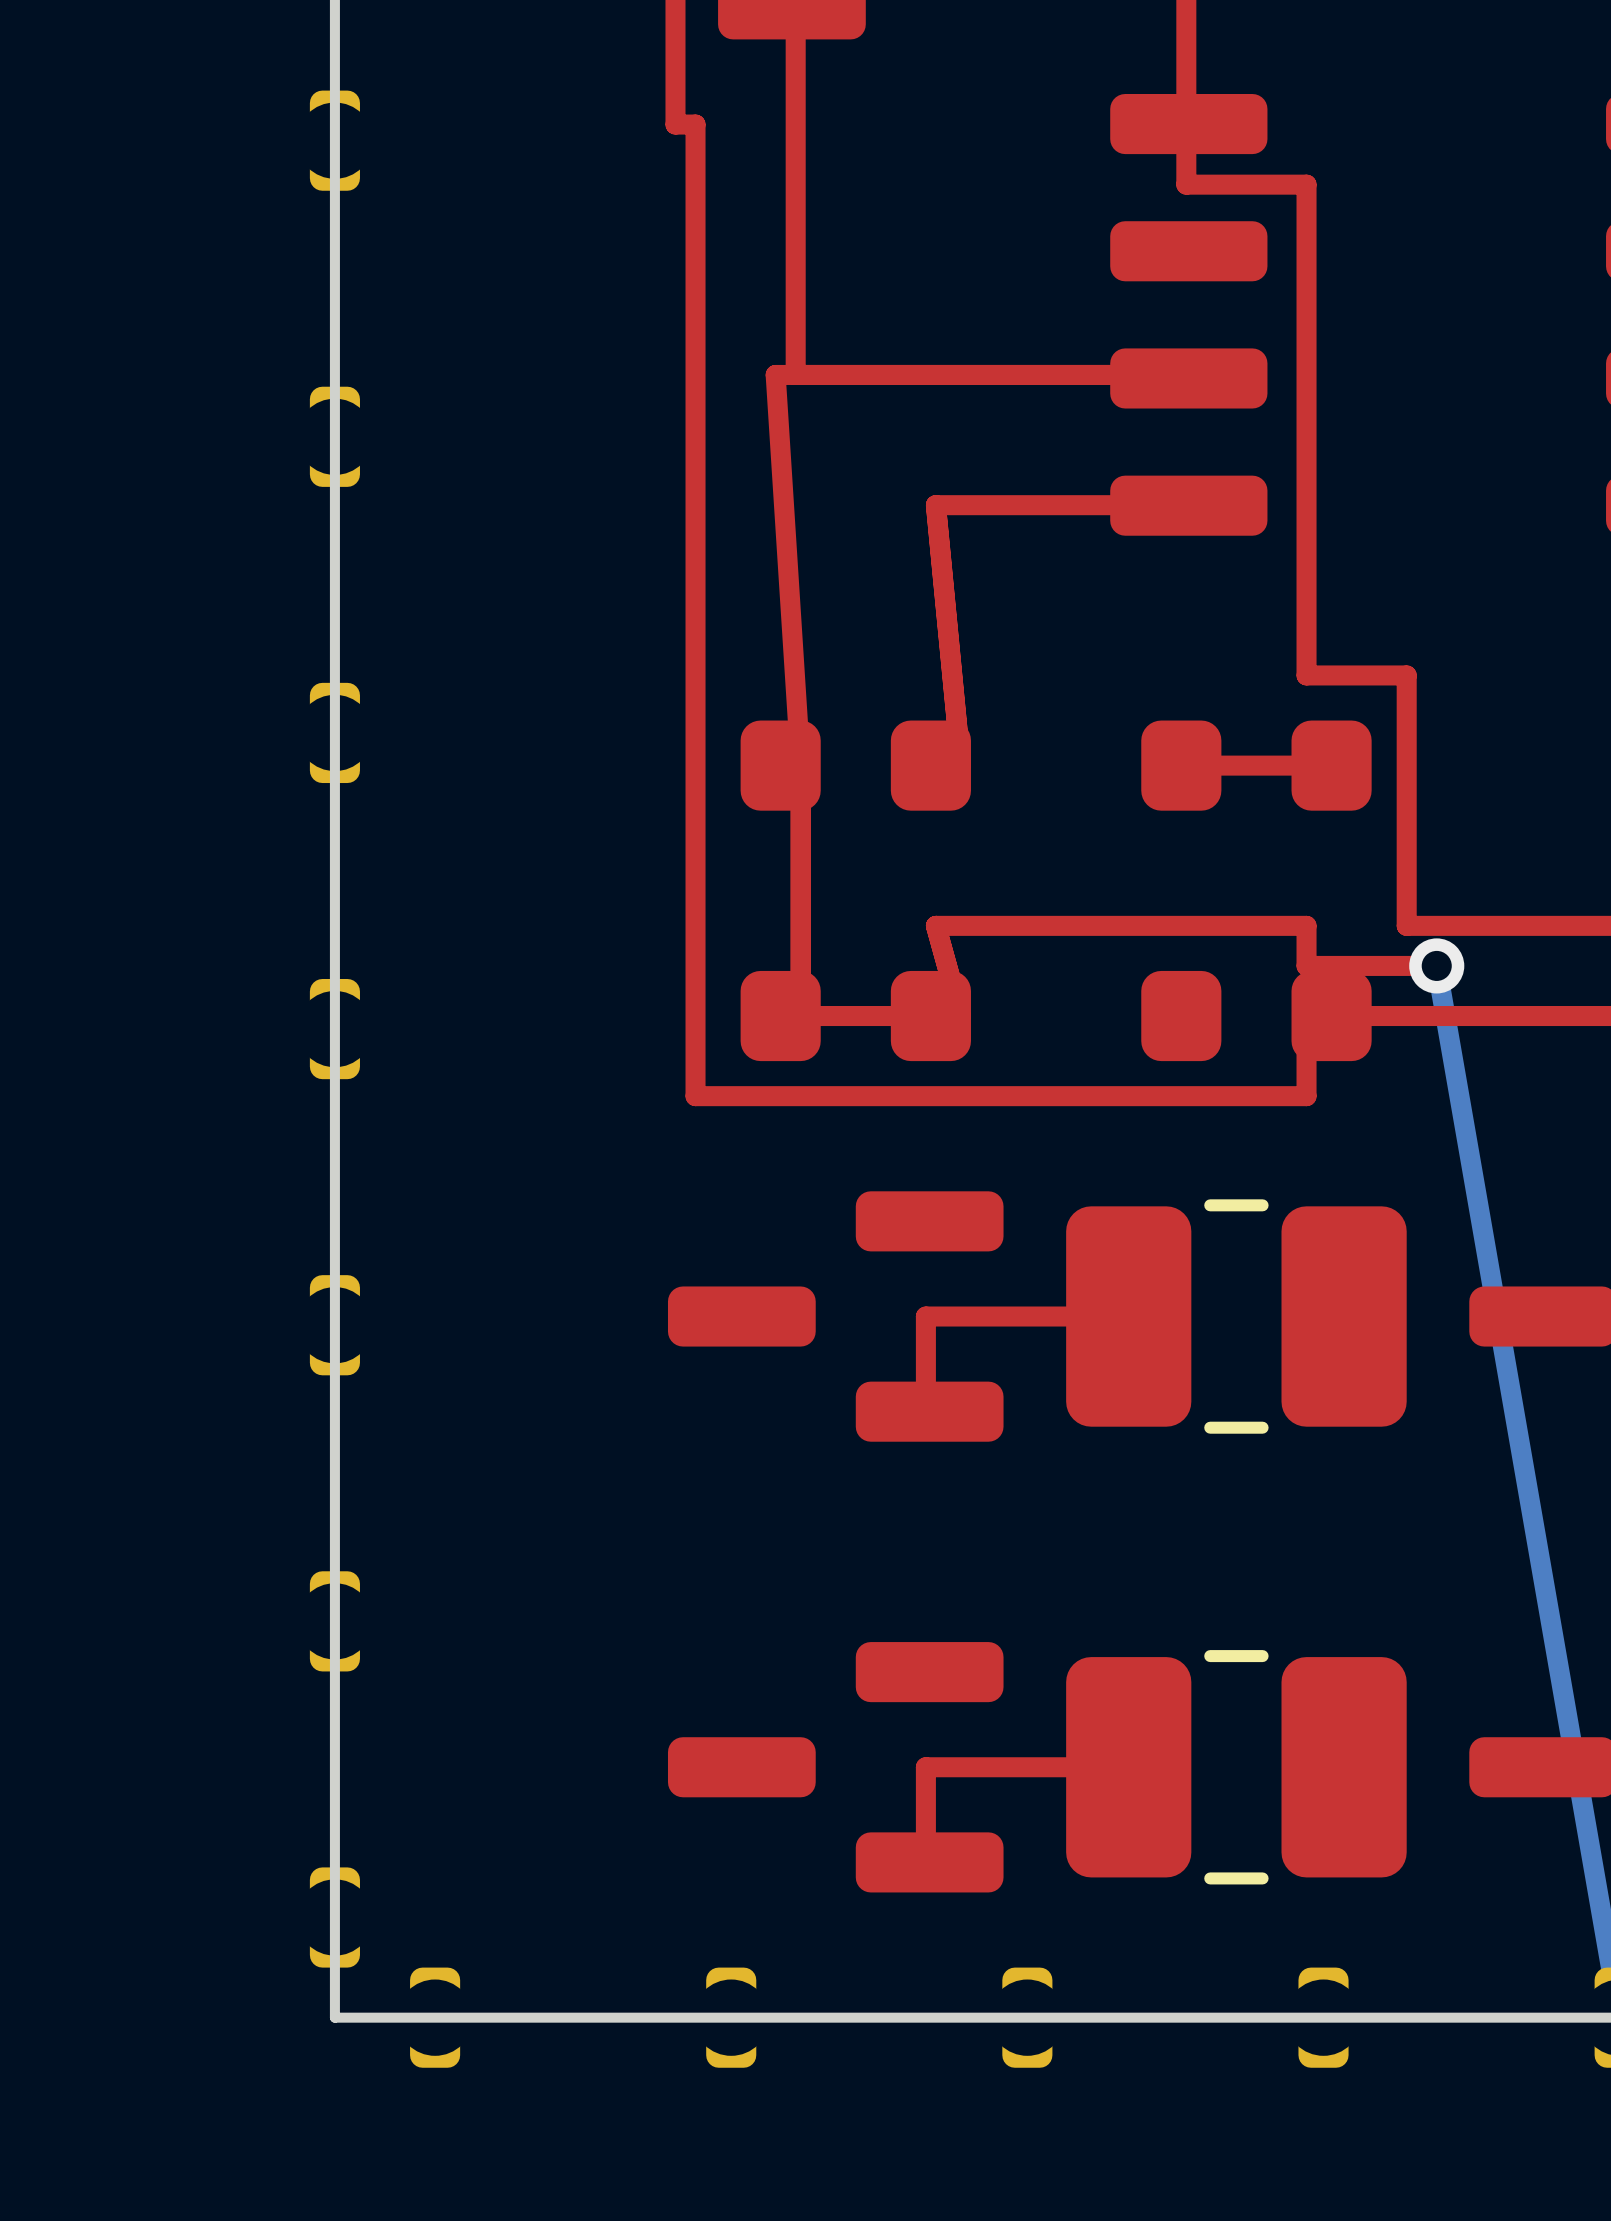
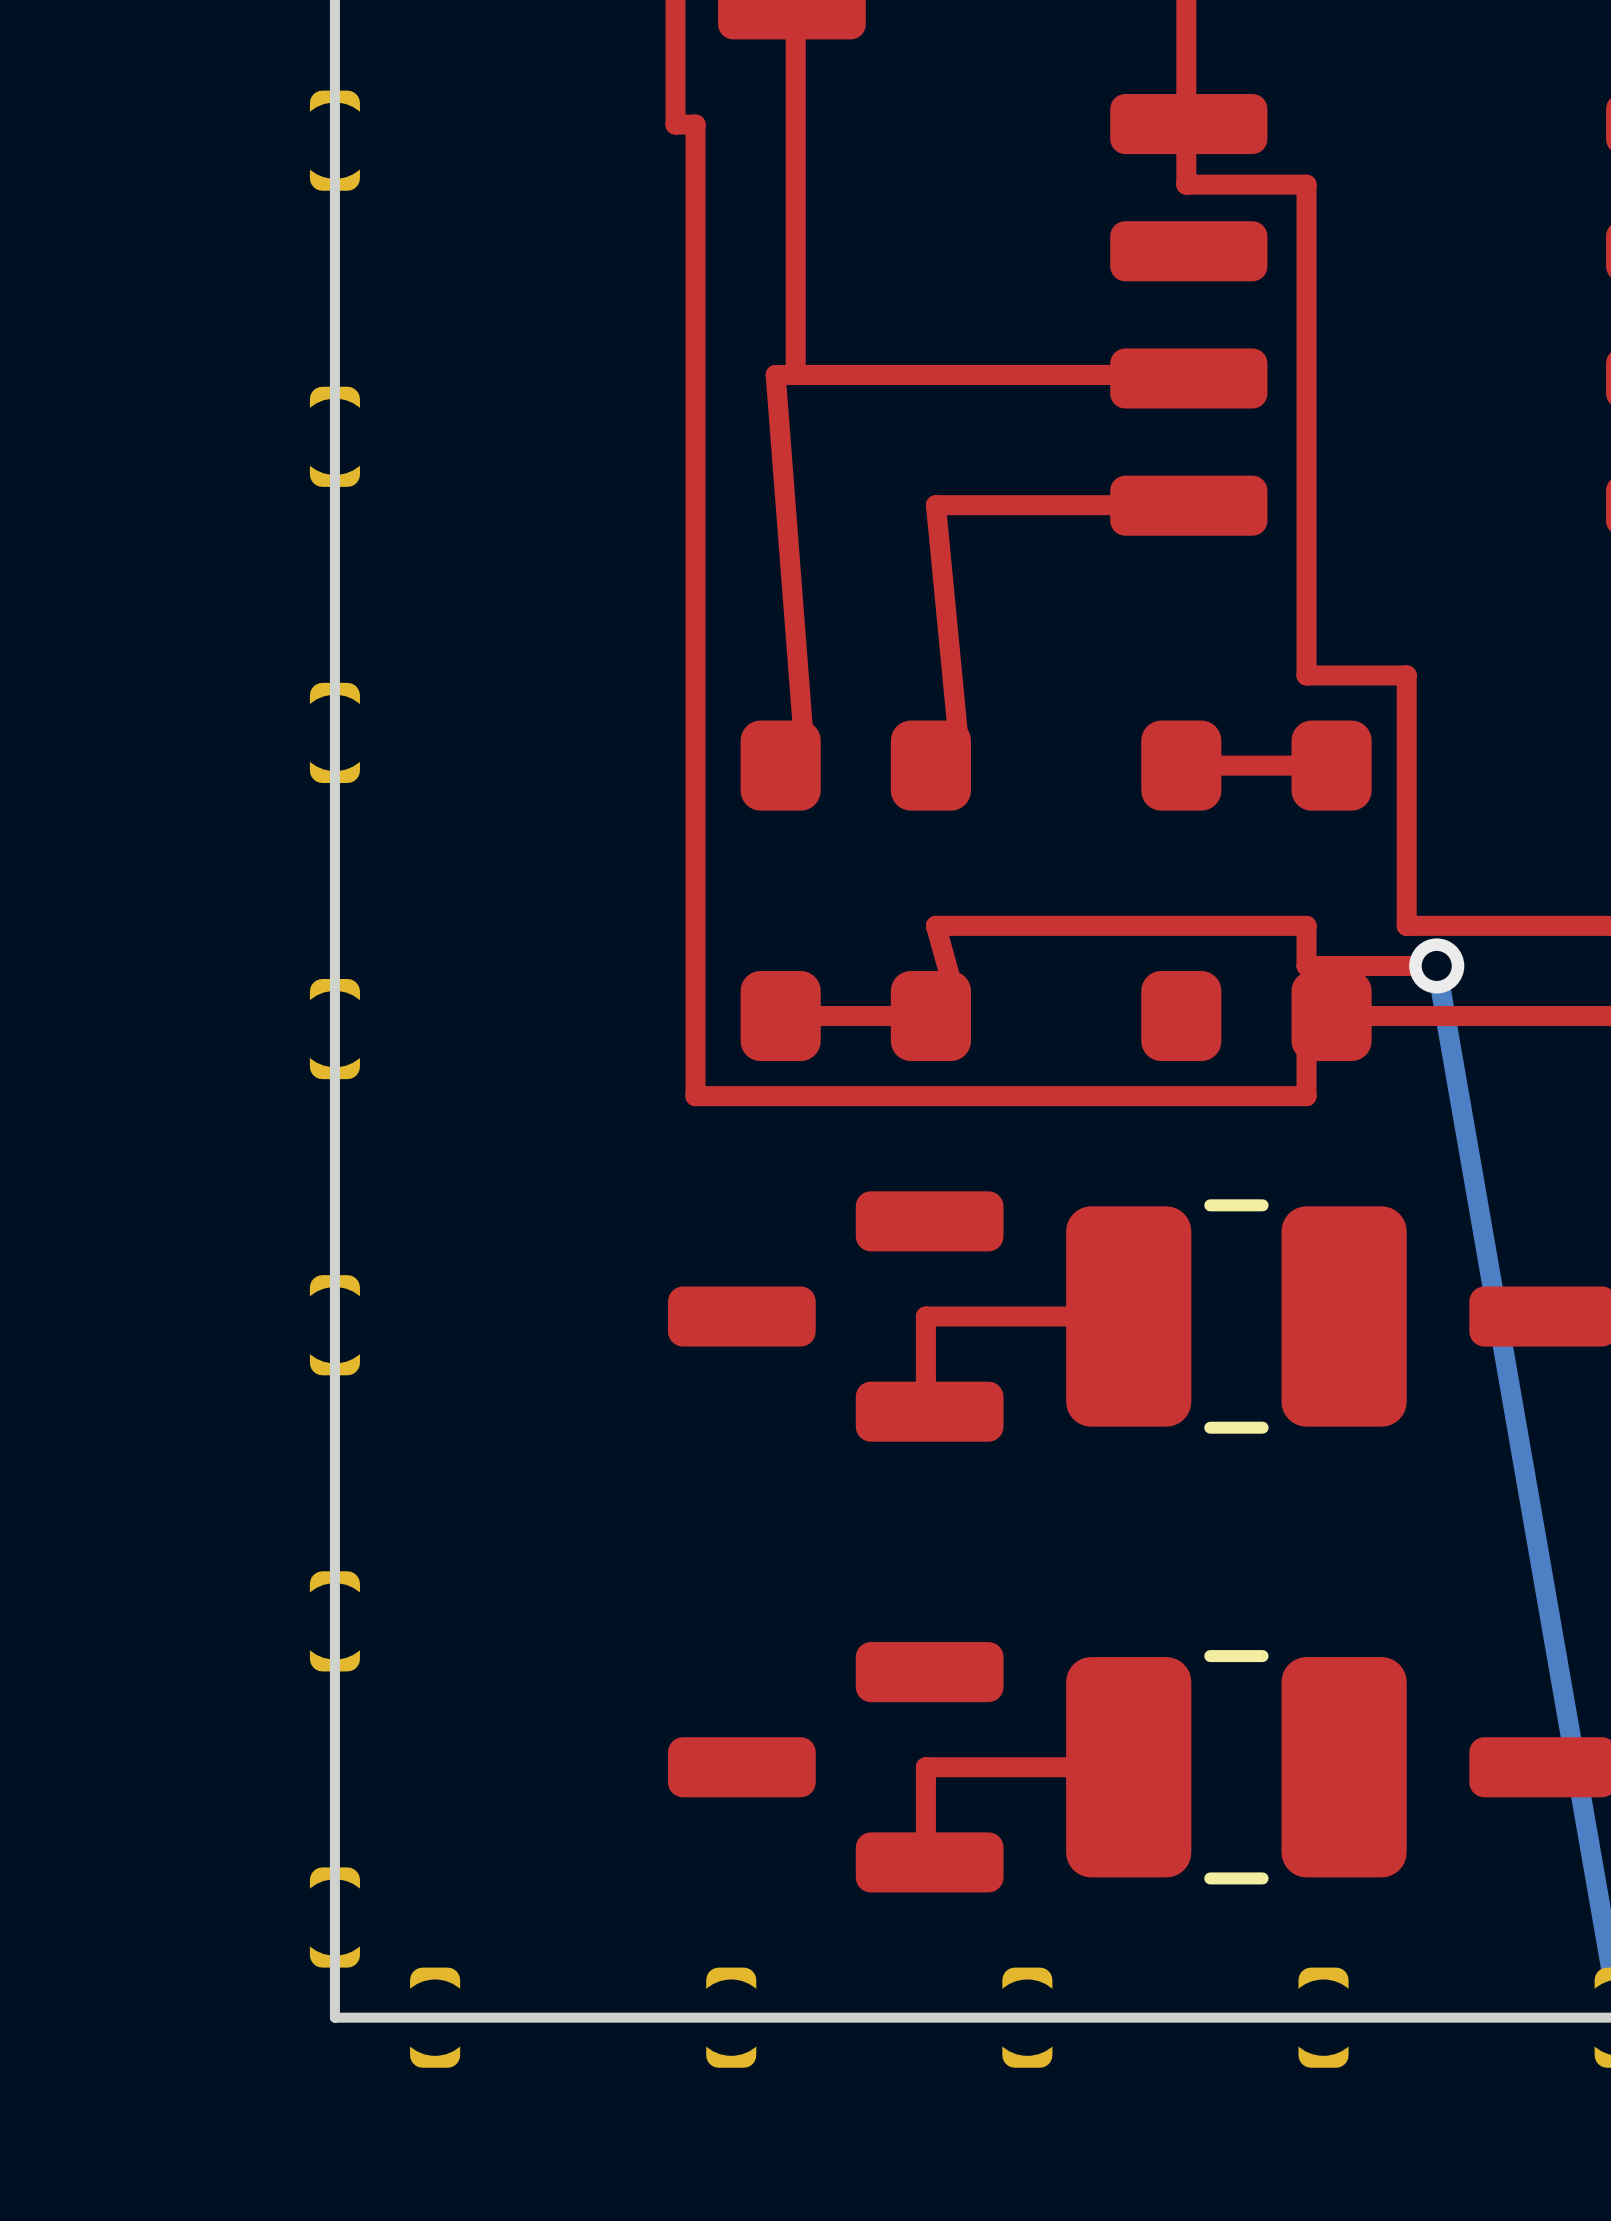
top track: (775, 374) (800, 765) (800, 1016) -> (775, 374) (805, 765) (800, 765)

